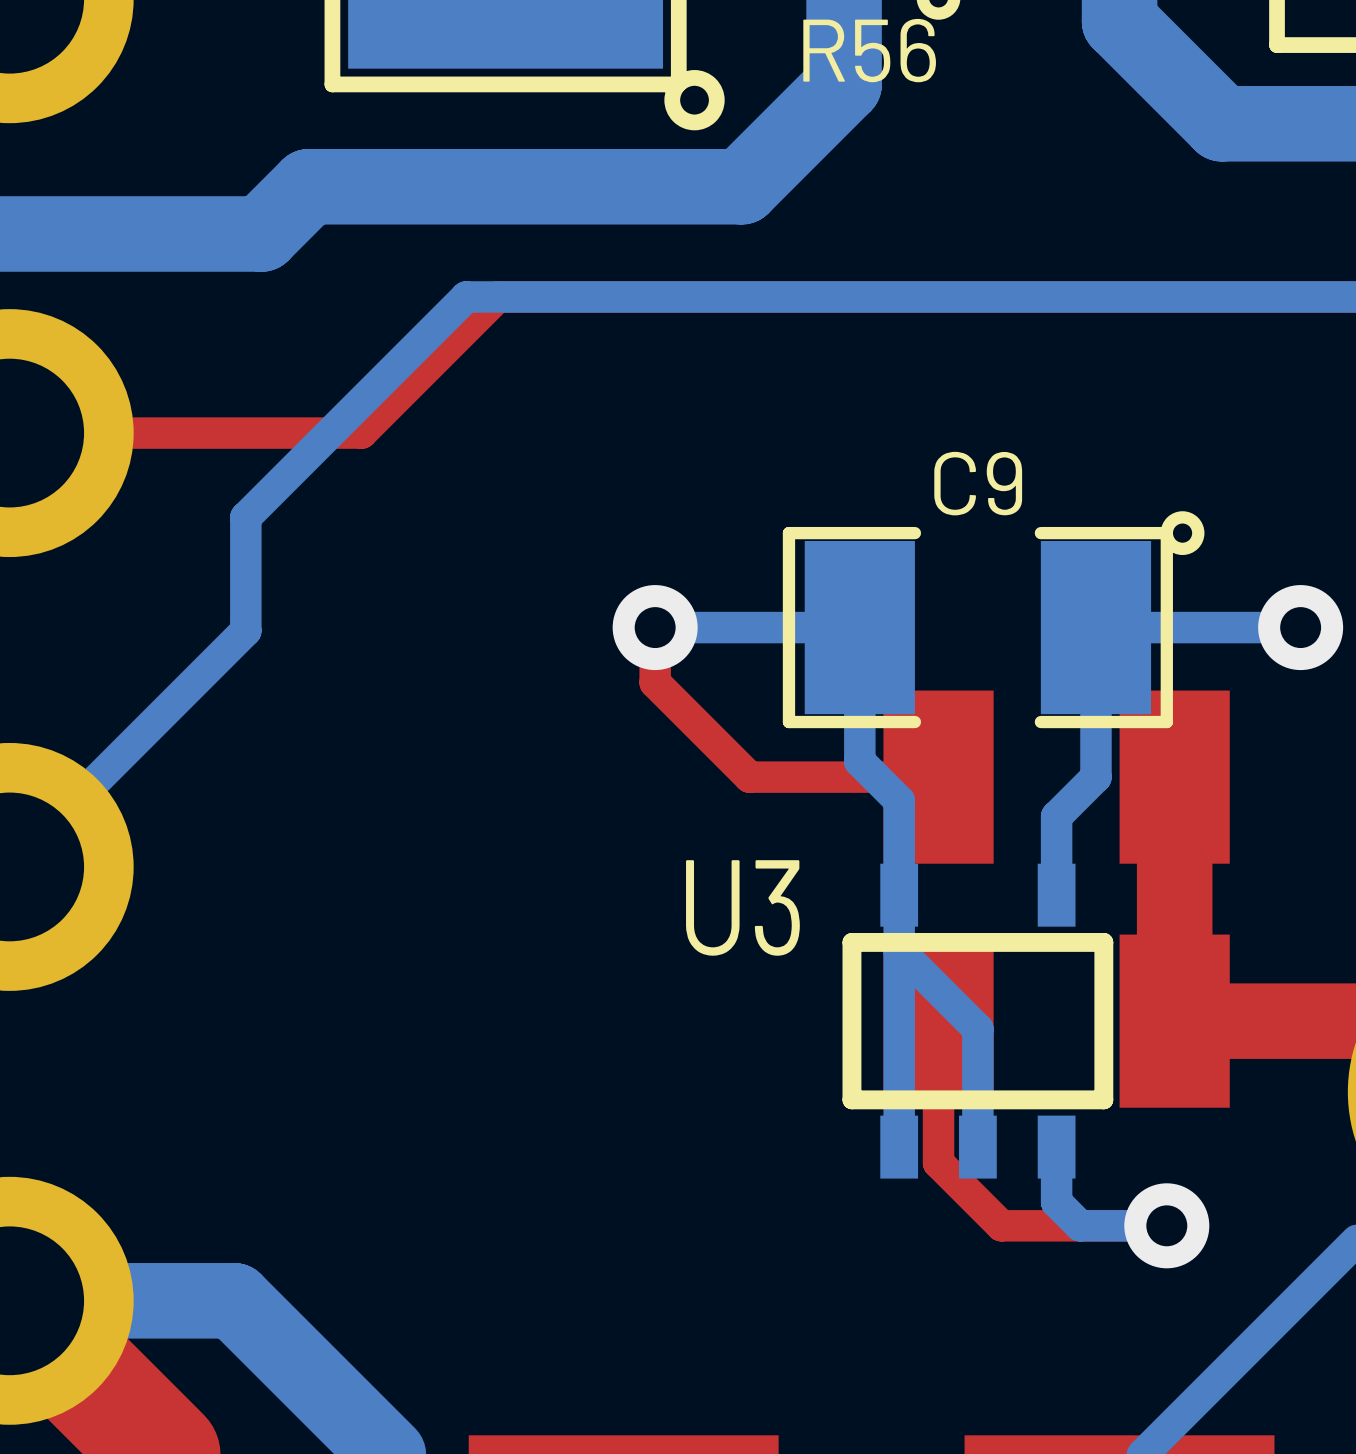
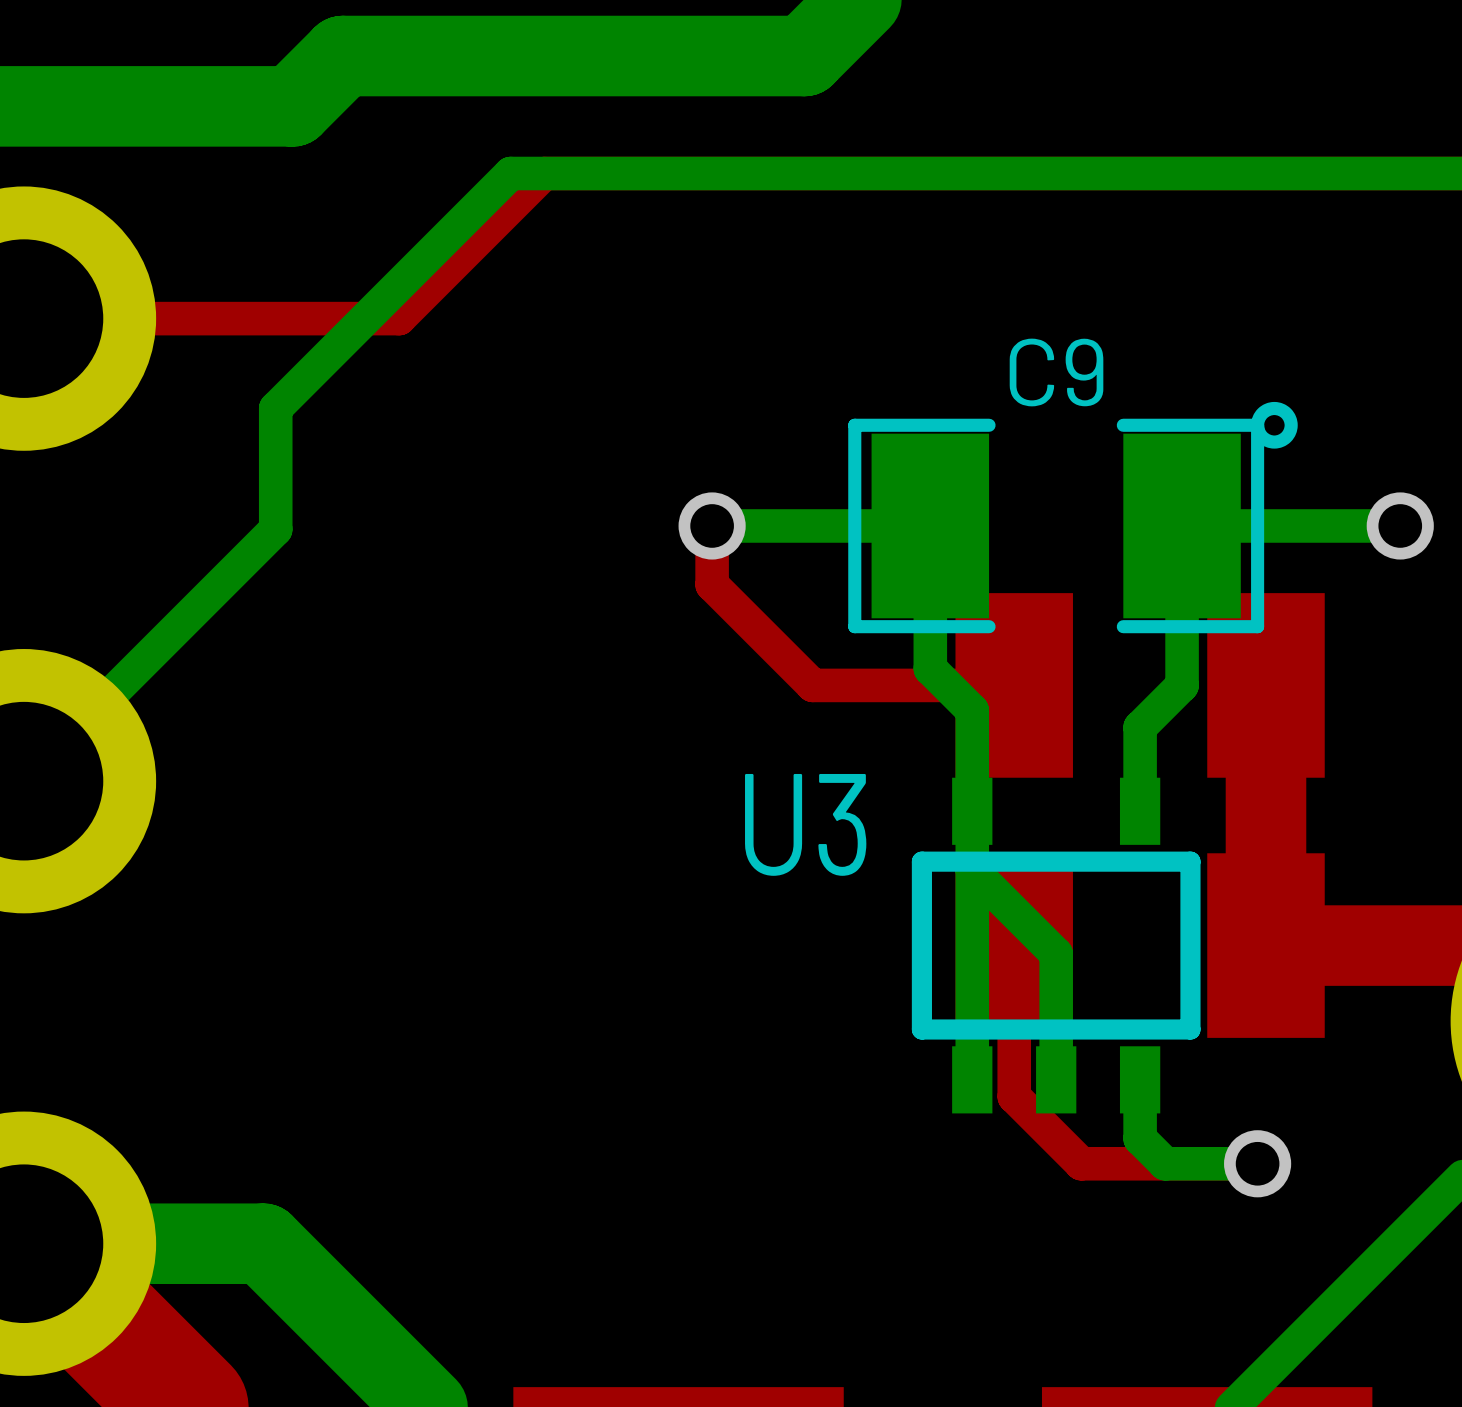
via size: [612, 585, 698, 671] -> [678, 492, 746, 560]
via size: [1258, 585, 1344, 671] -> [1366, 492, 1434, 560]
via size: [1124, 1183, 1210, 1269] -> [1224, 1130, 1292, 1198]

